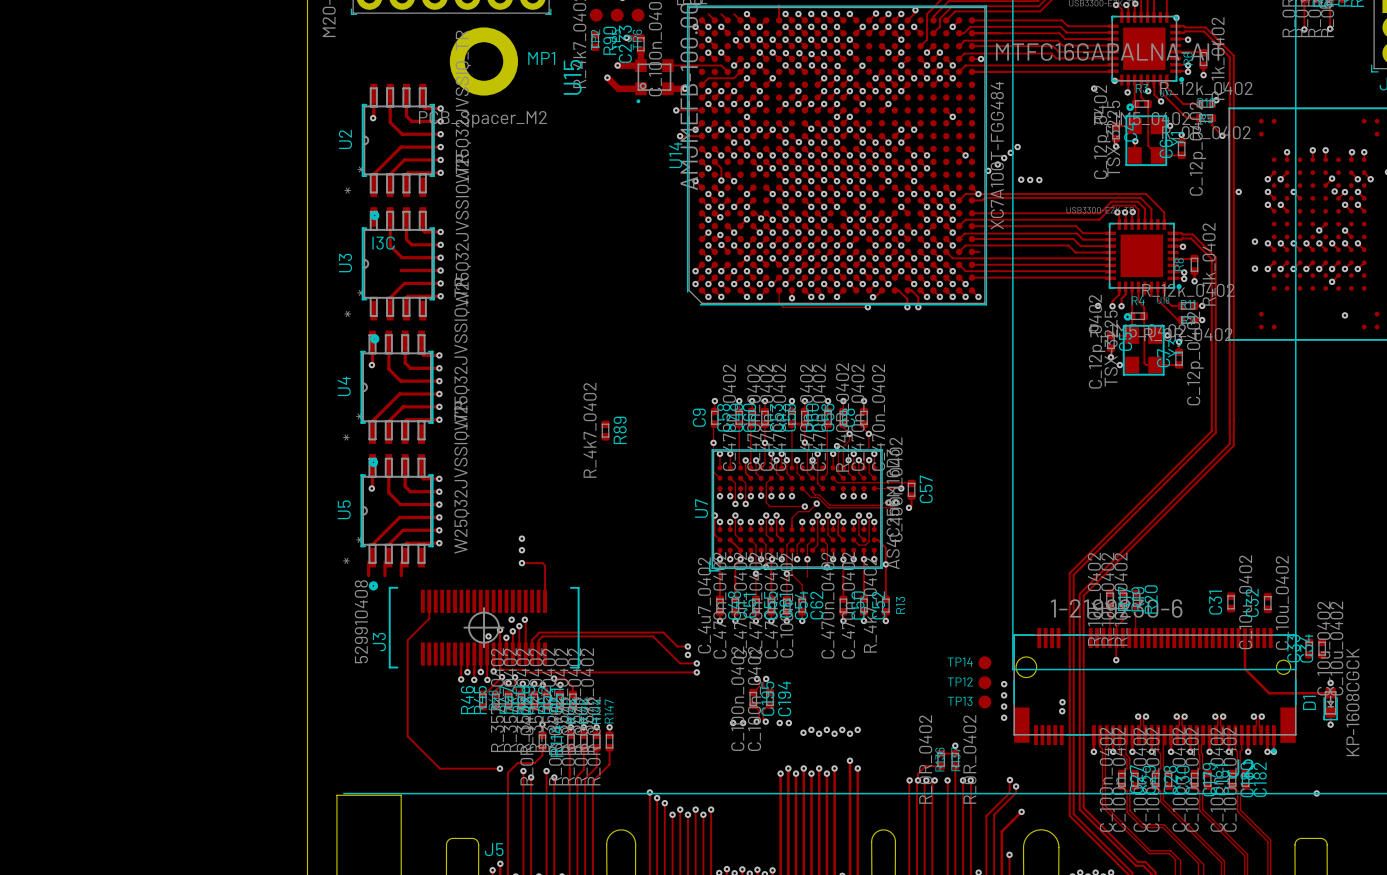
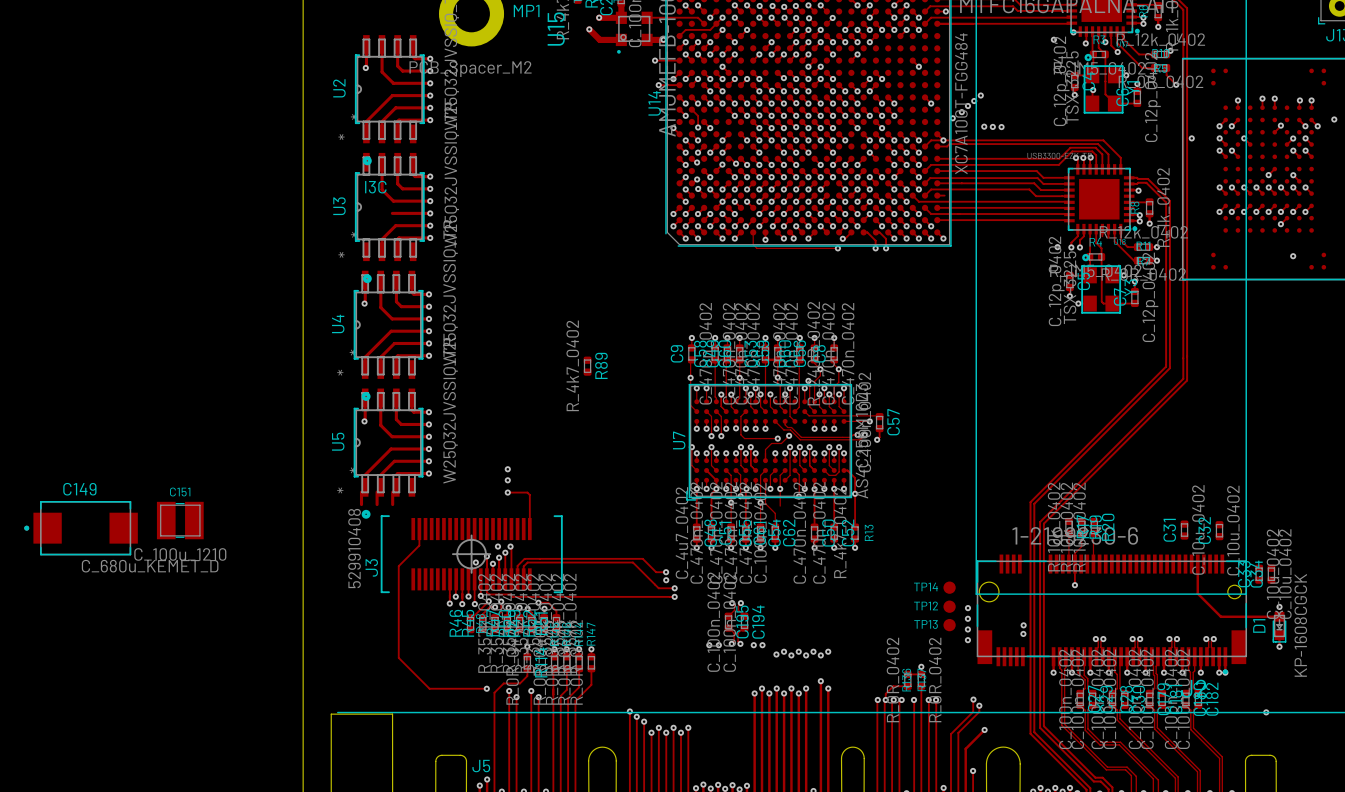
via: (1334, 191) -> none
via: (1254, 241) -> none
via: (1254, 268) -> none
C151: none -> C_100u_1210 (180, 520)
C149: none -> C_680u_KEMET_D (81, 528)

